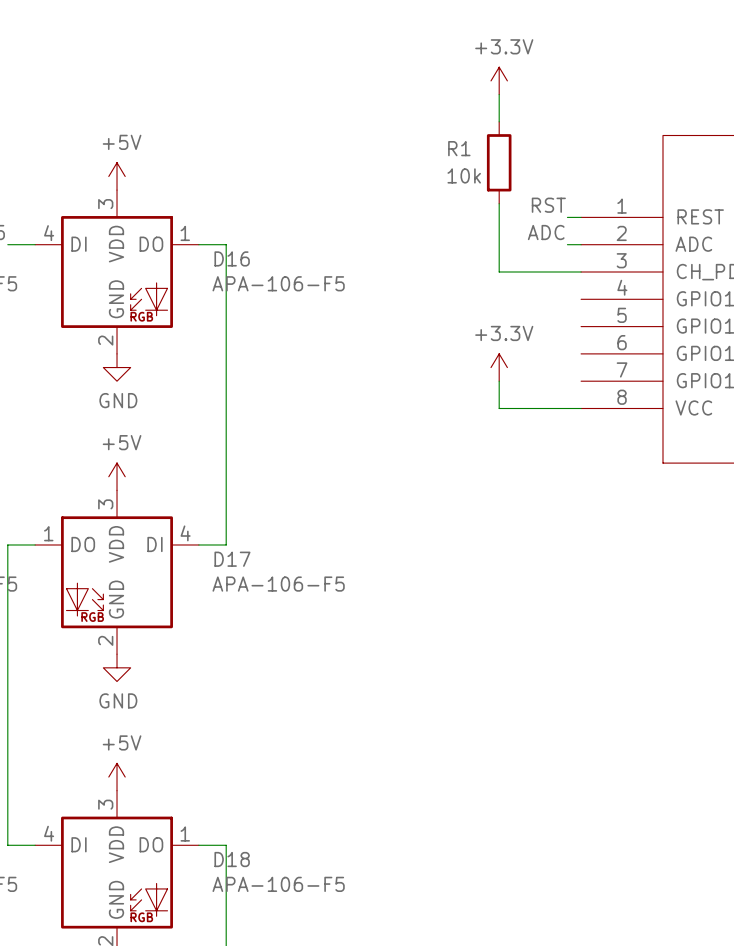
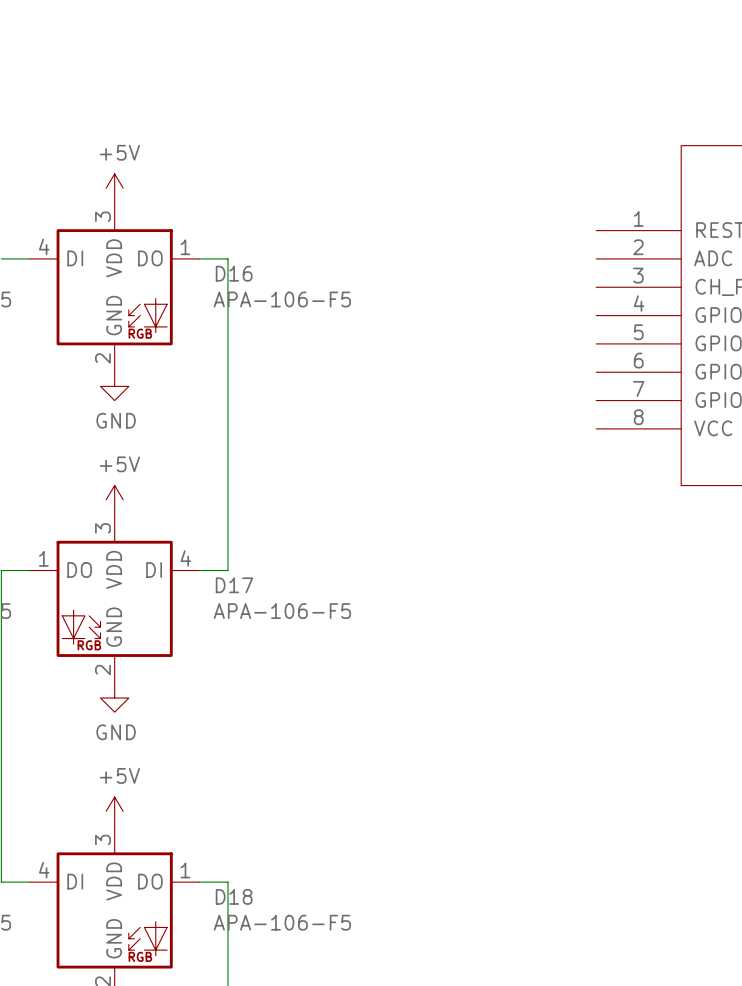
power symbol: +3.3V (499, 80) -> none
wire: (499, 94) (499, 121) -> none
R1: 10k (499, 162) -> none
wire: (499, 203) (499, 272) (581, 272) -> none
label: RST (548, 205) -> none
wire: (567, 217) (581, 217) -> none
label: ADC (546, 232) -> none
wire: (567, 244) (581, 244) -> none
power symbol: +3.3V (499, 367) -> none
wire: (499, 381) (499, 408) (581, 408) -> none

